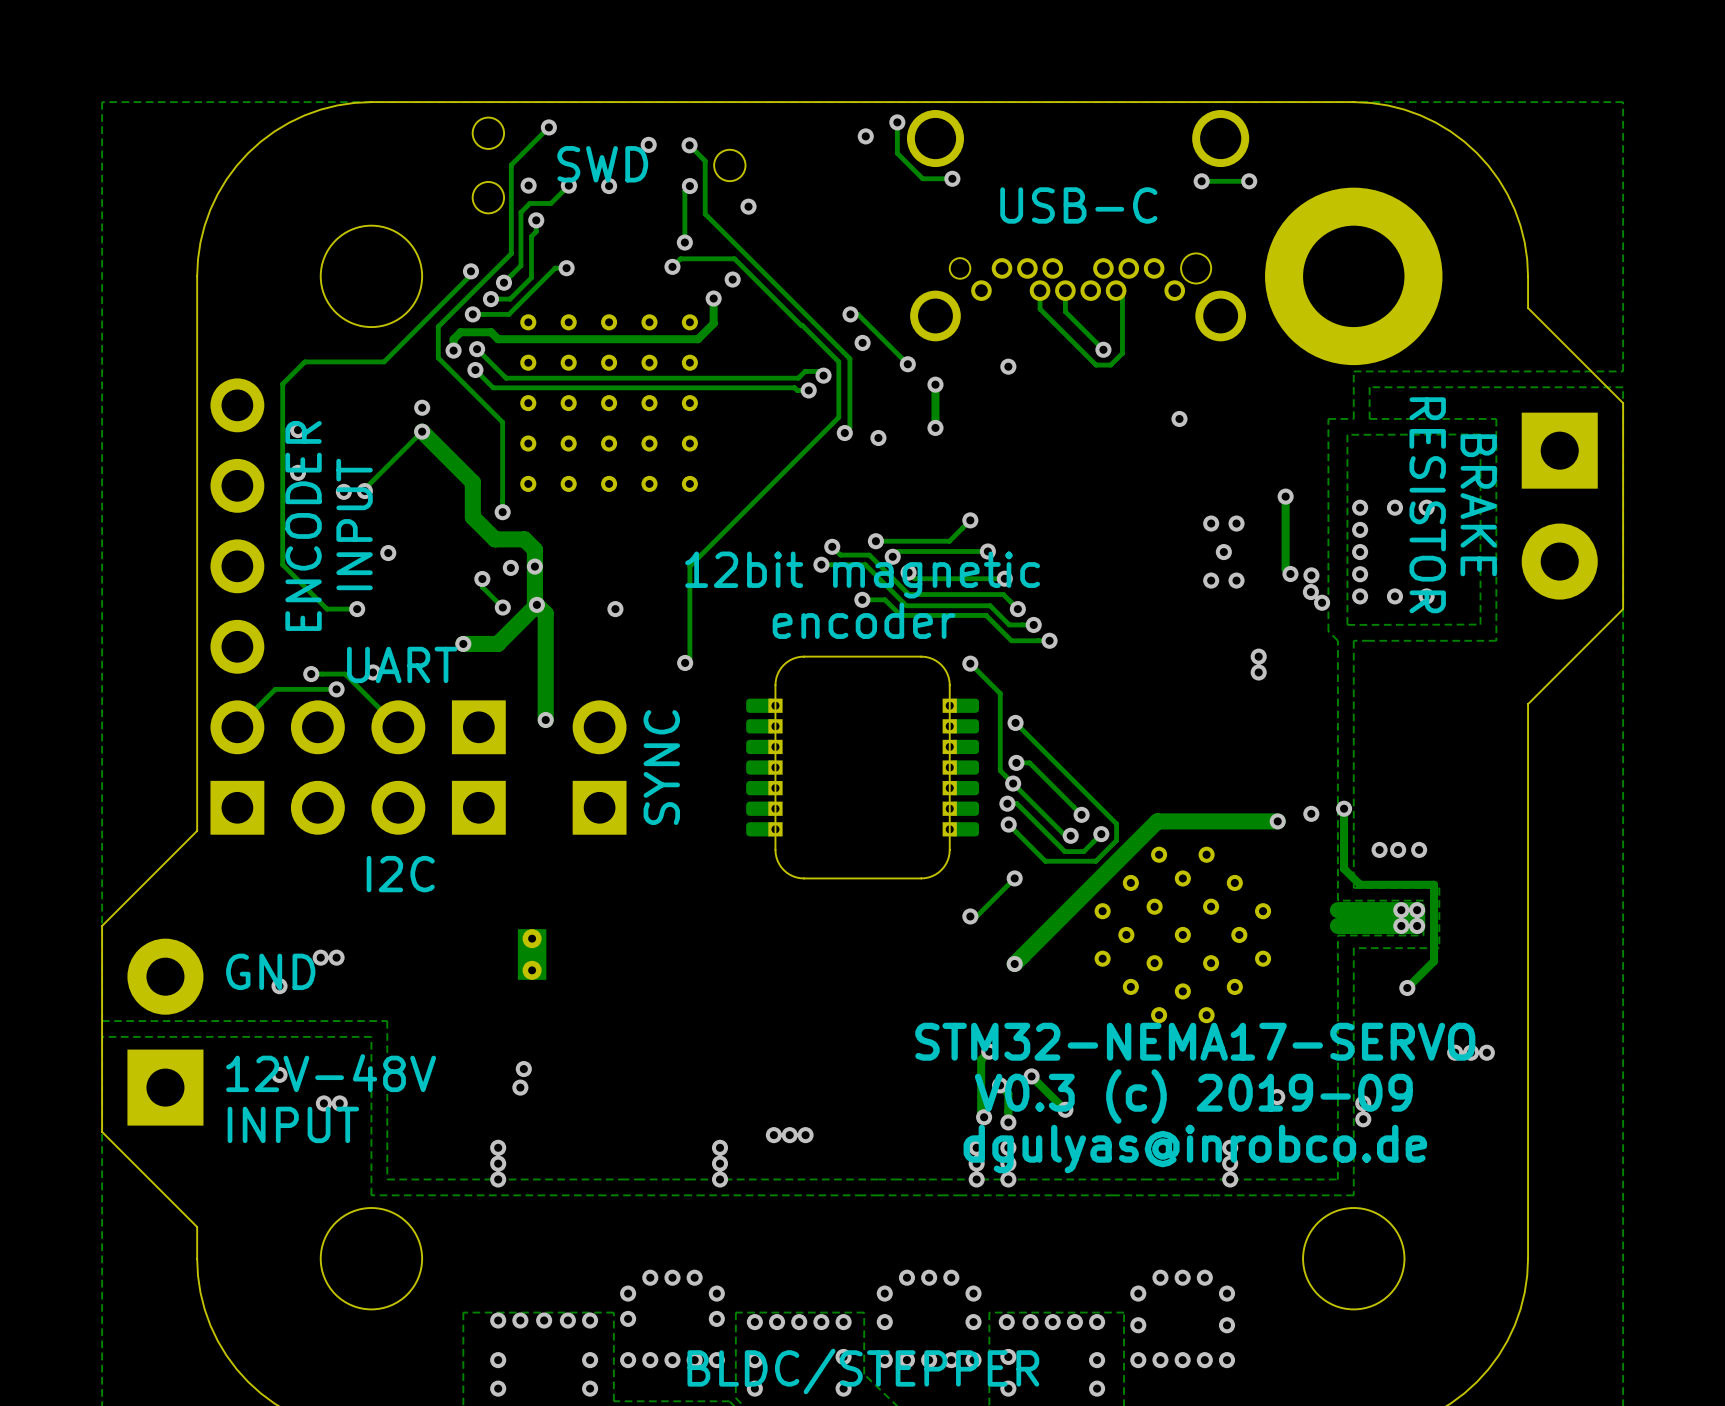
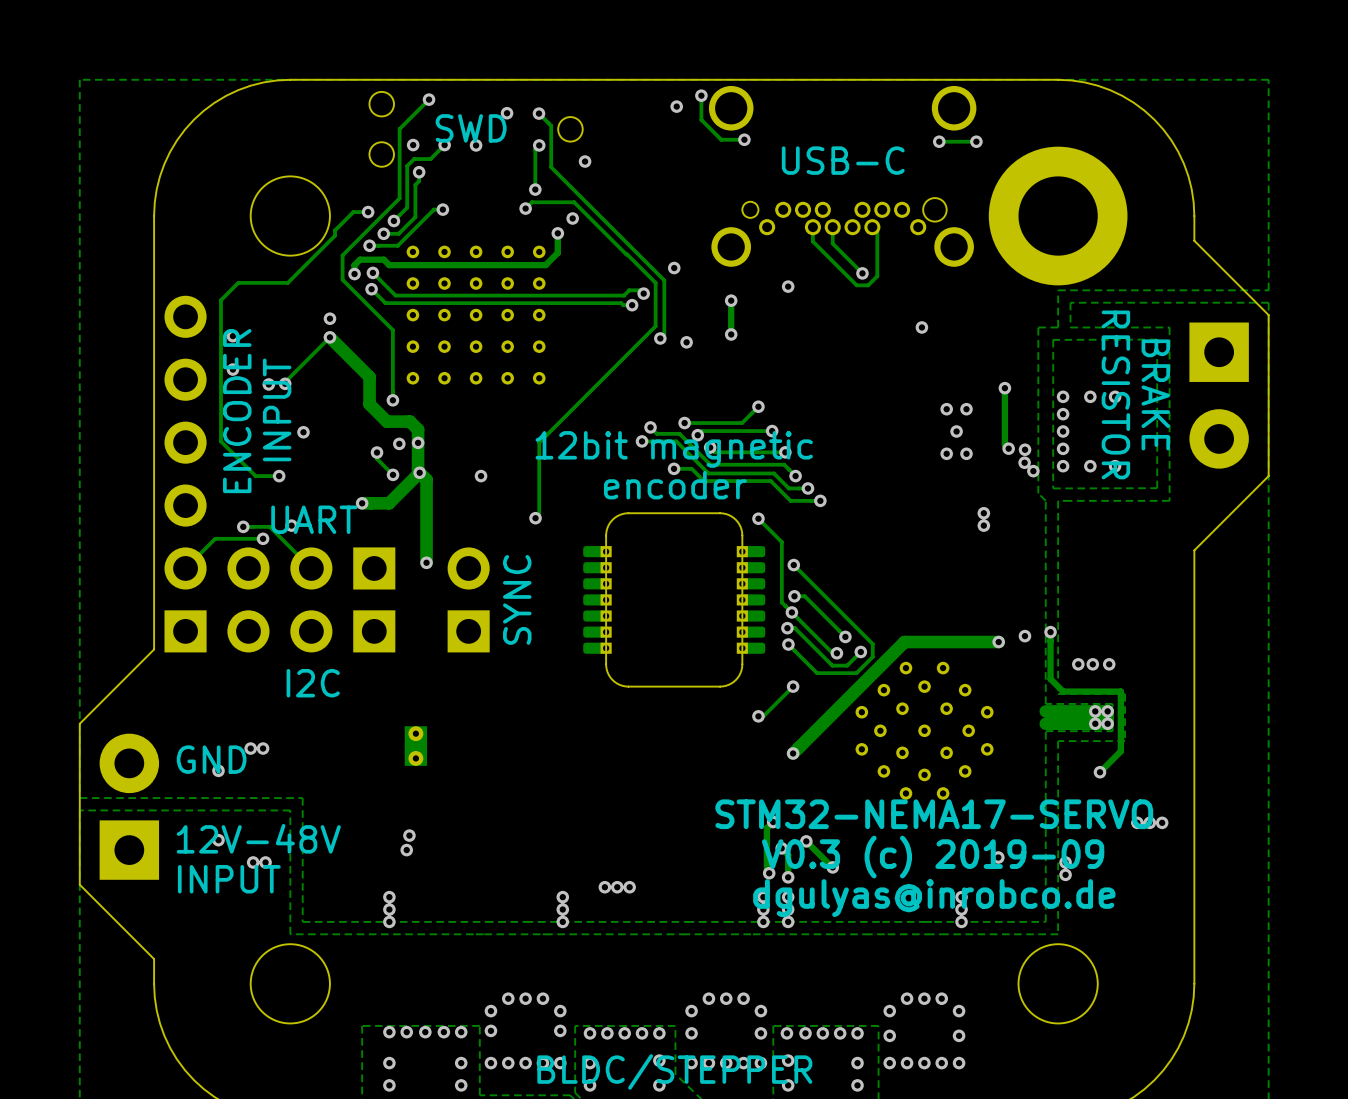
track: (470, 271) (470, 275) (384, 361) (368, 361) -> (368, 212) (353, 212) (335, 230) (335, 235) (287, 282)
track: (850, 314) (857, 314) (907, 364) -> none
via: (850, 314) -> none
via: (907, 364) -> none

